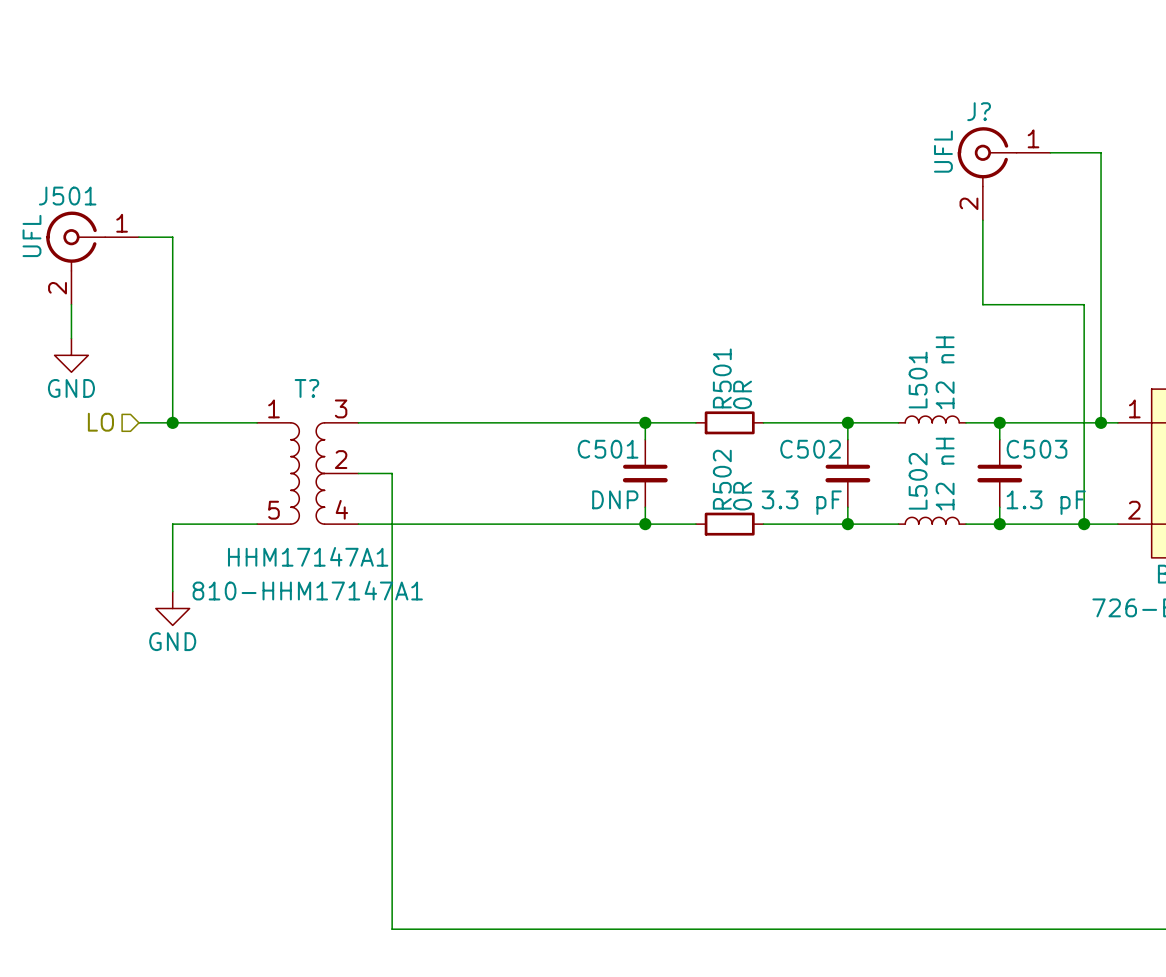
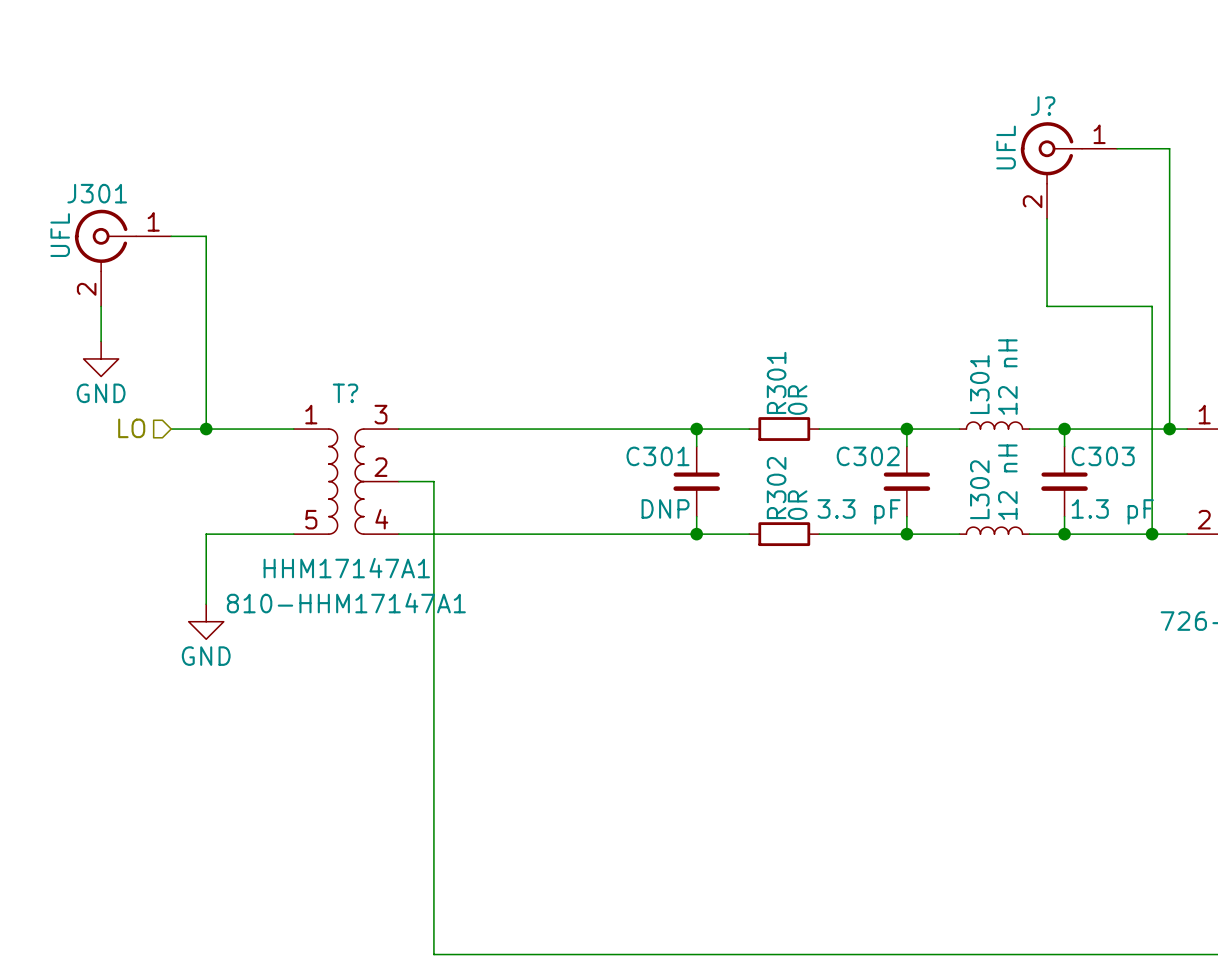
J501 name: J501 (67, 196) -> J301 (97, 193)
R501 name: R501 (722, 378) -> R301 (776, 382)
L501 name: L501 (918, 380) -> L301 (979, 384)
C501 name: C501 (608, 449) -> C301 (658, 456)
C502 name: C502 (810, 449) -> C302 (868, 456)
C503 name: C503 (1037, 449) -> C303 (1103, 456)
R502 name: R502 (722, 479) -> R302 (776, 488)
L502 name: L502 (918, 481) -> L302 (979, 489)

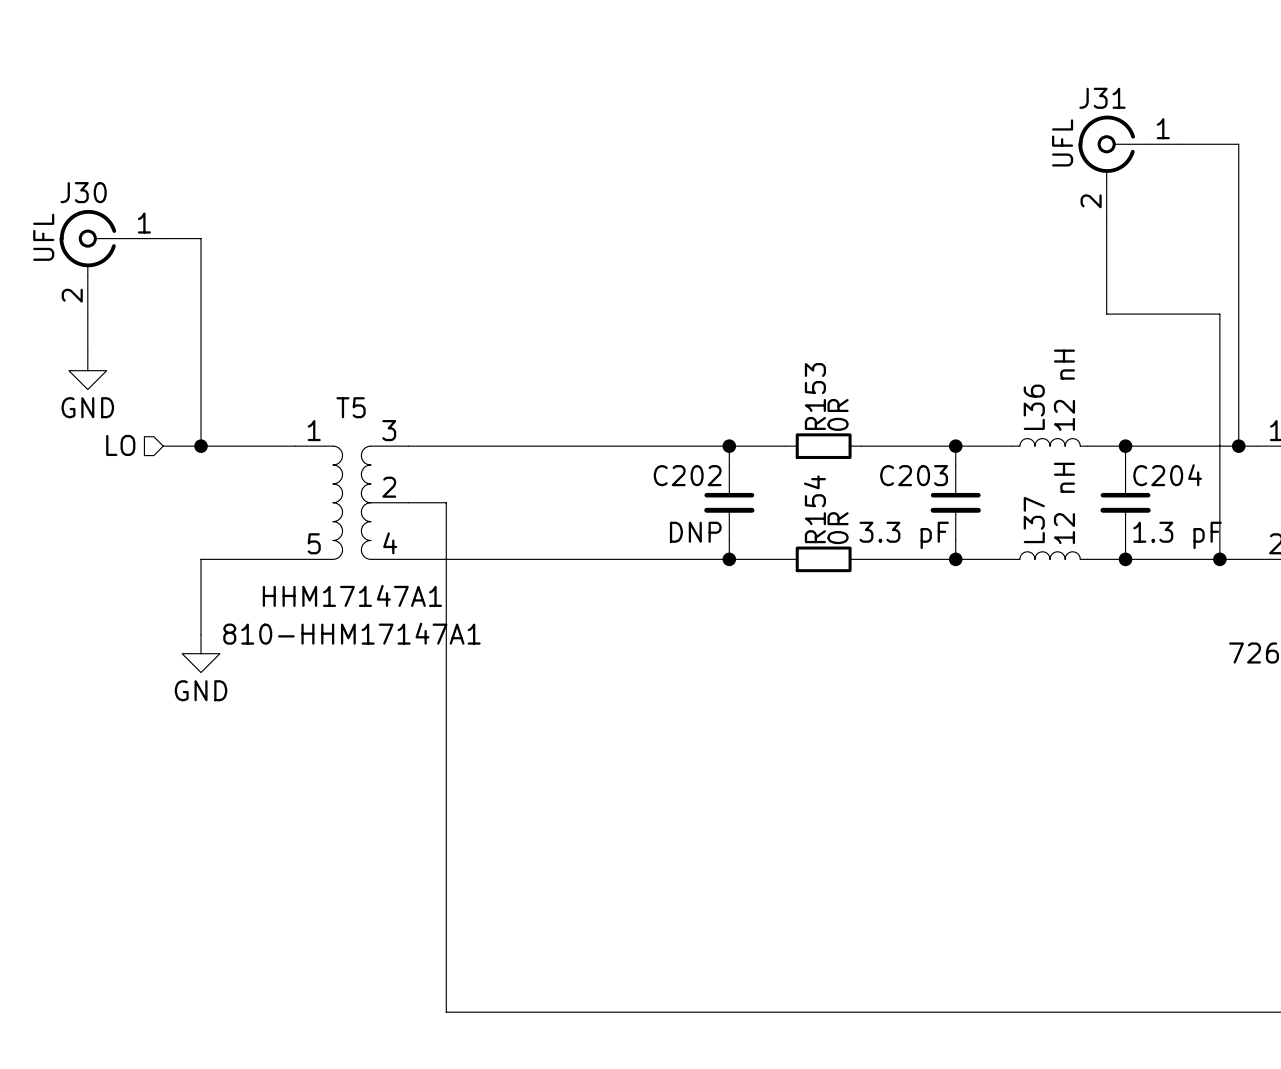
J? name: J? (1043, 106) -> J31 (1102, 98)
J301 name: J301 (97, 193) -> J30 (83, 192)
R301 name: R301 (776, 382) -> R153 (815, 396)
L301 name: L301 (979, 384) -> L36 (1034, 407)
T? name: T? (345, 393) -> T5 (351, 407)
C301 name: C301 (658, 456) -> C202 (687, 475)
C302 name: C302 (868, 456) -> C203 (914, 475)
C303 name: C303 (1103, 456) -> C204 (1167, 475)
R302 name: R302 (776, 488) -> R154 (814, 509)
L302 name: L302 (979, 489) -> L37 (1034, 520)

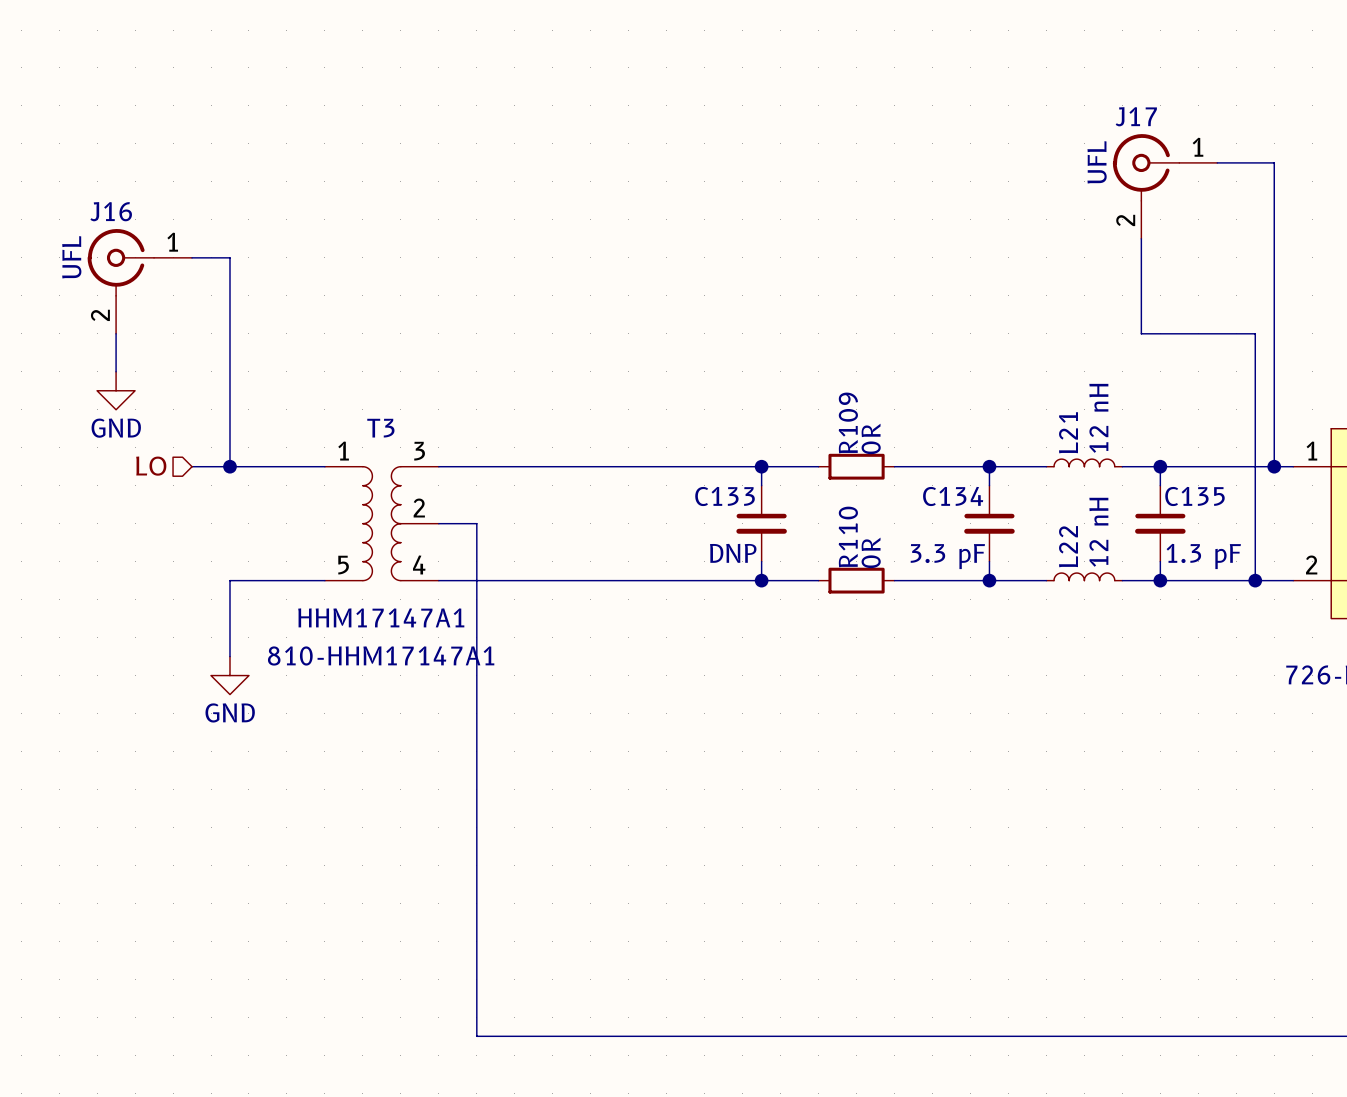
J31 name: J31 (1102, 98) -> J17 (1136, 116)
J30 name: J30 (83, 192) -> J16 (111, 211)
R153 name: R153 (815, 396) -> R109 (848, 422)
T5 name: T5 (351, 407) -> T3 (380, 428)
L36 name: L36 (1034, 407) -> L21 (1068, 432)
C202 name: C202 (687, 475) -> C133 (725, 496)
C203 name: C203 (914, 475) -> C134 (953, 496)
C204 name: C204 (1167, 475) -> C135 (1194, 496)
R154 name: R154 (814, 509) -> R110 (848, 536)
L37 name: L37 (1034, 520) -> L22 (1068, 546)

